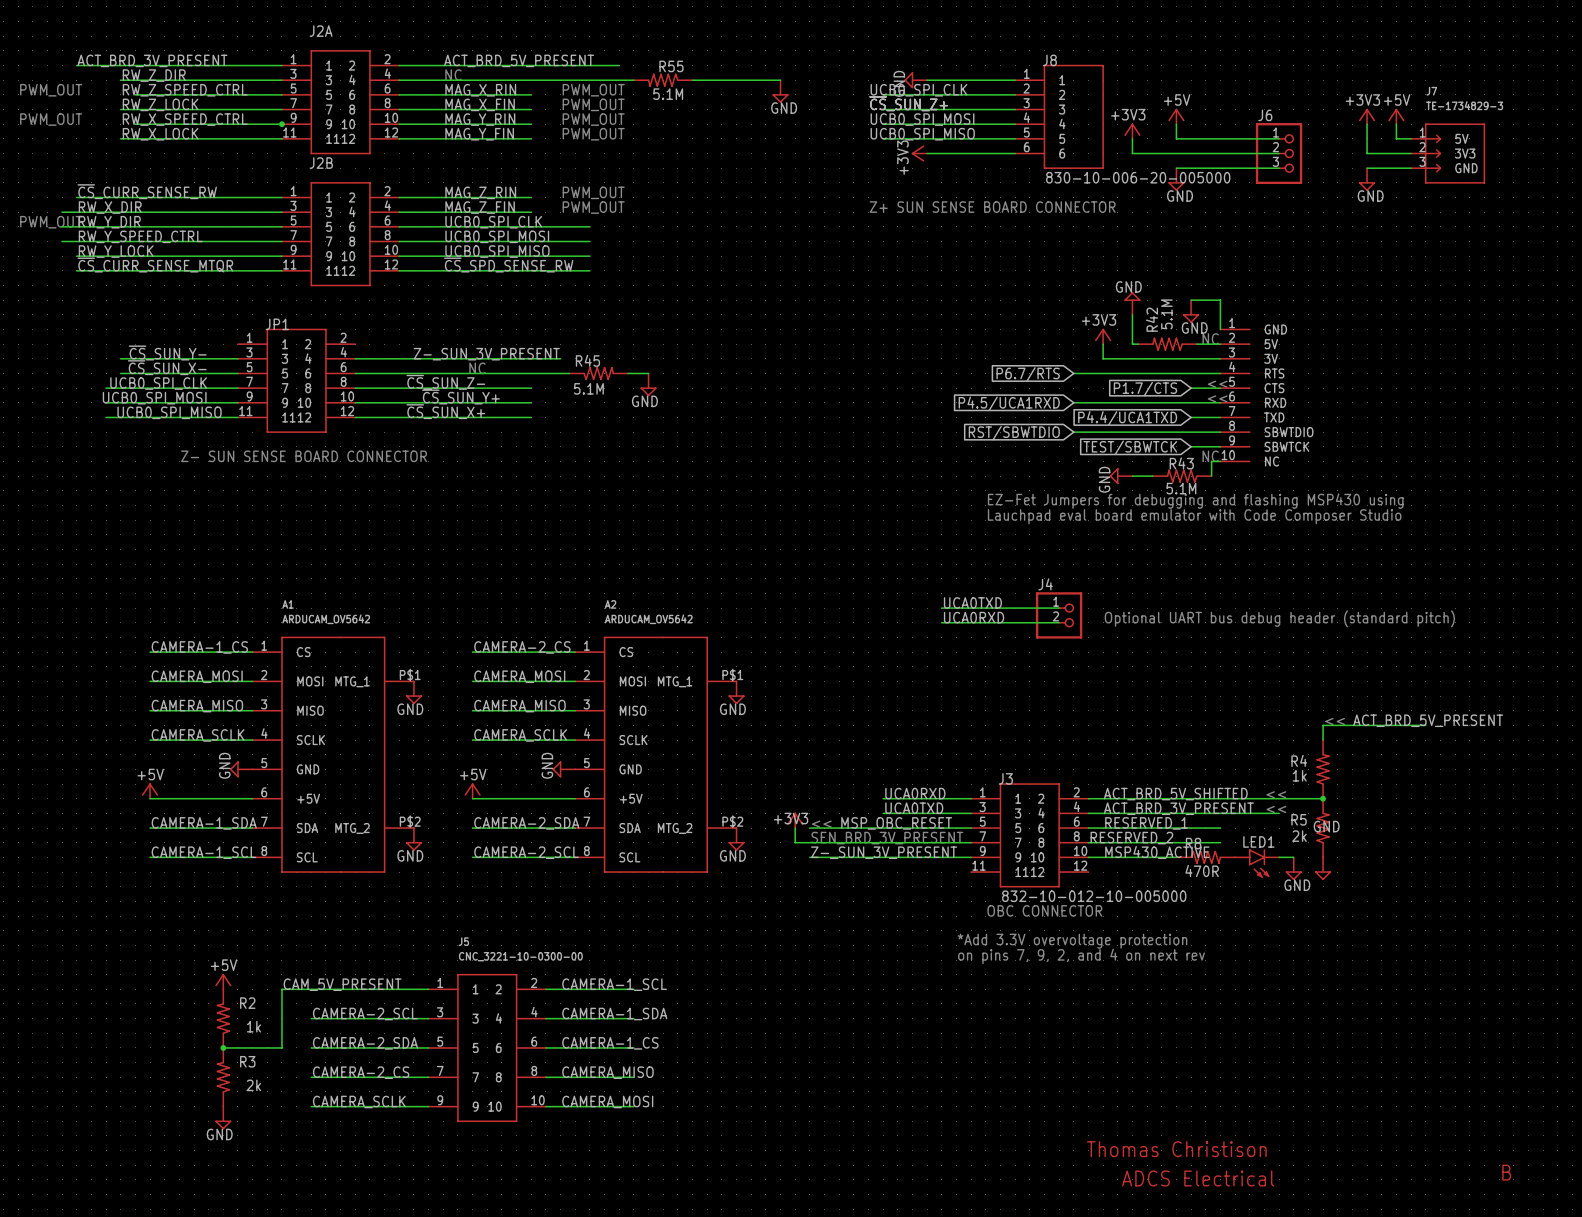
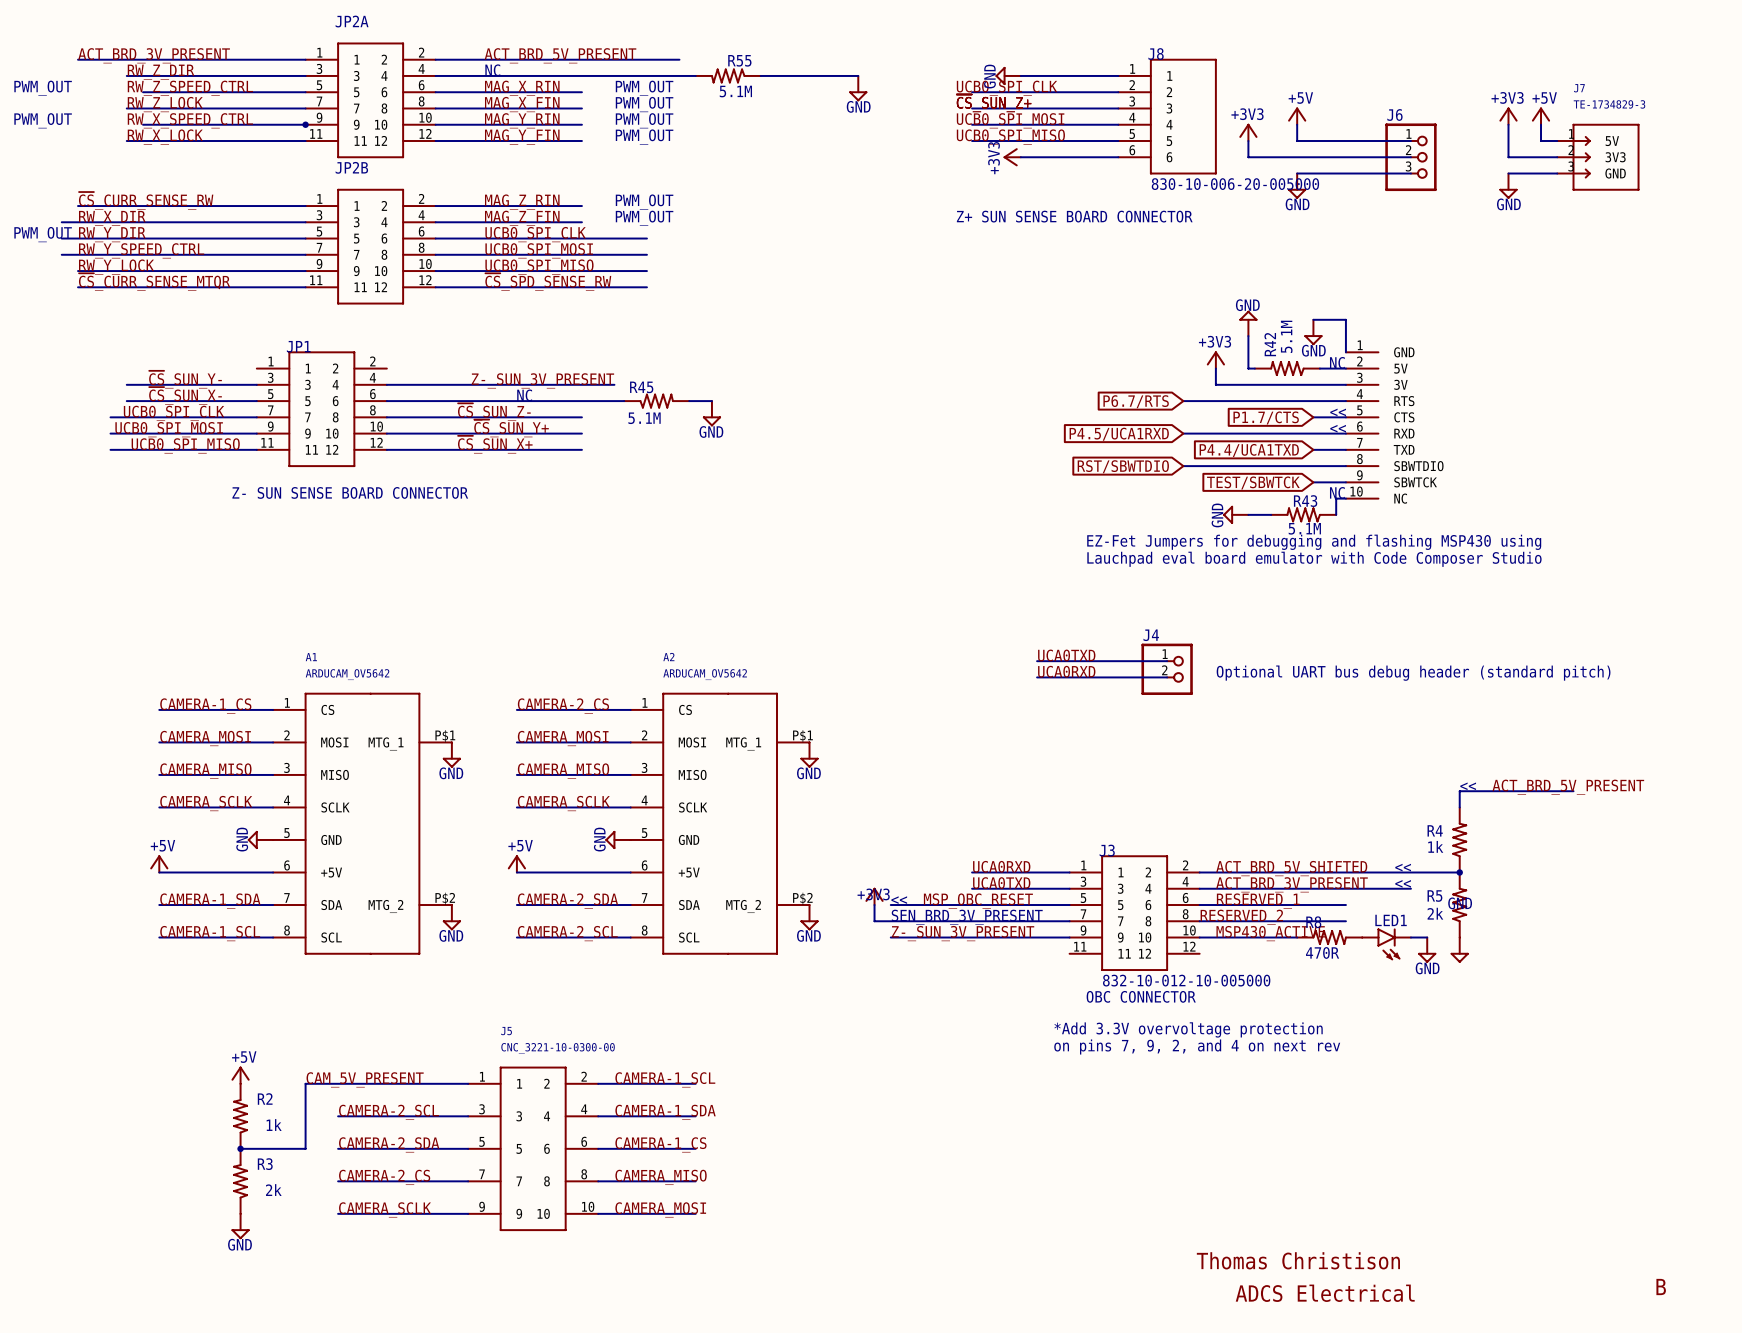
J2A name: J2A (321, 31) -> JP2A (352, 21)
J2B name: J2B (321, 163) -> JP2B (351, 167)

